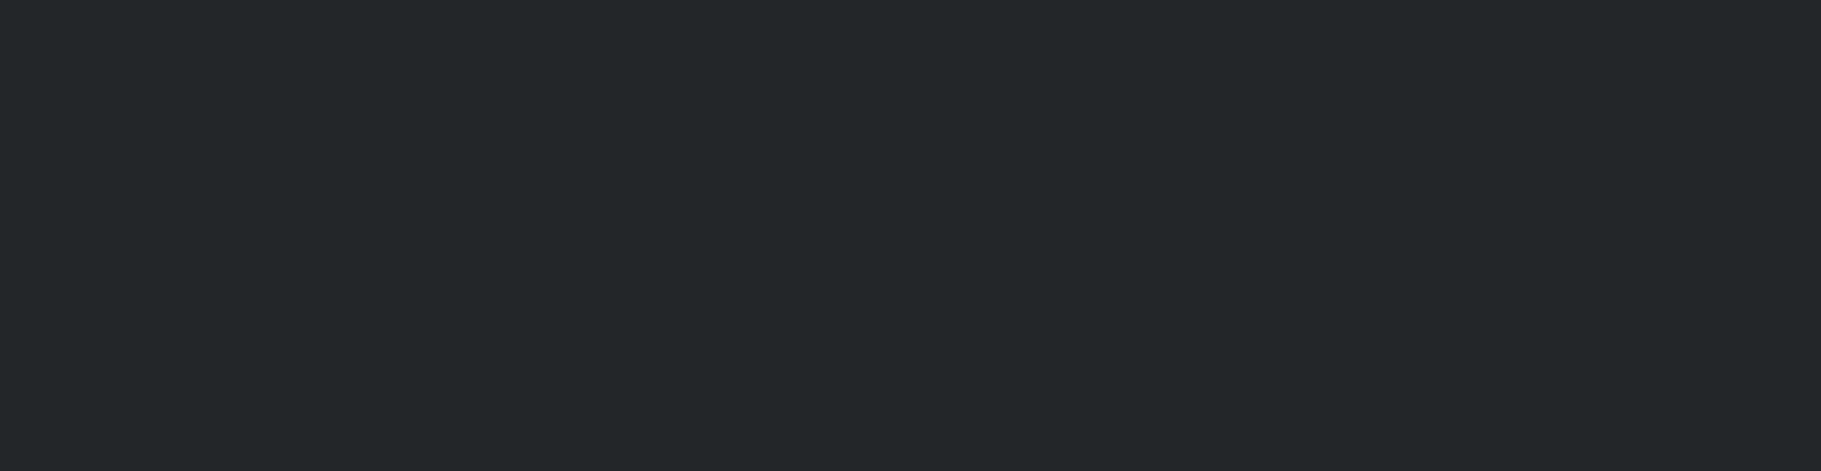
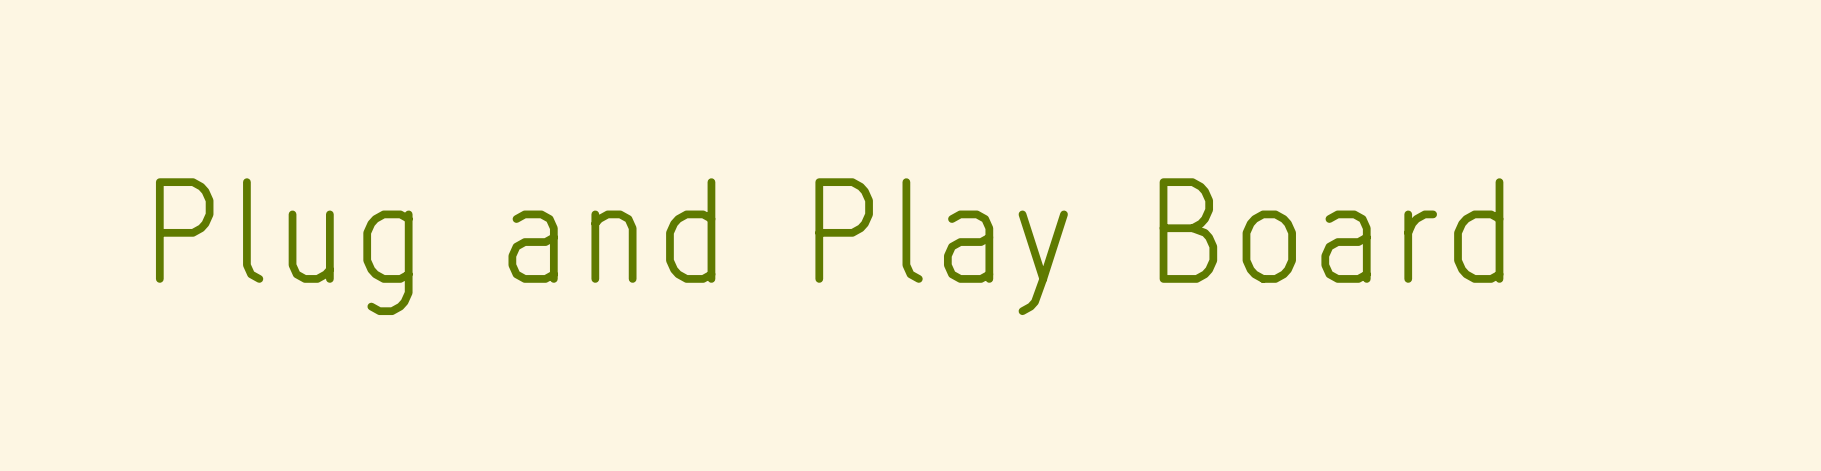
text: none -> Plug and Play Board (829, 246)

